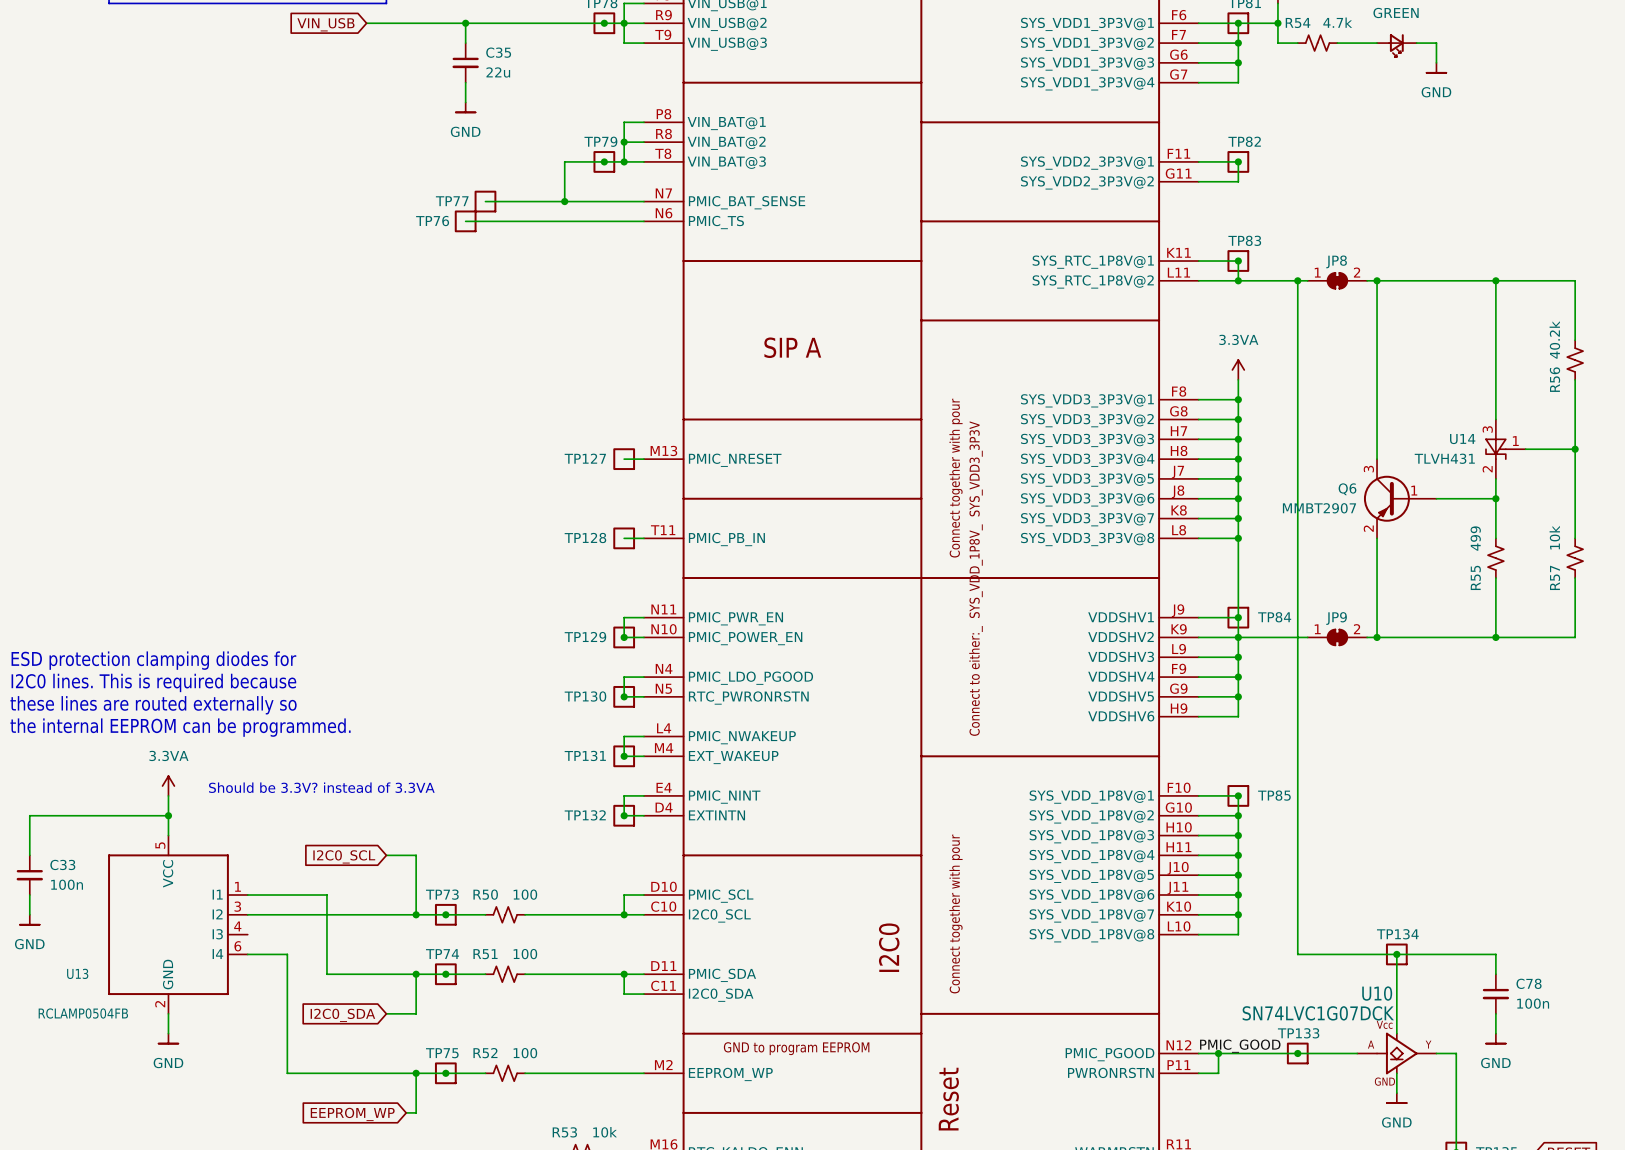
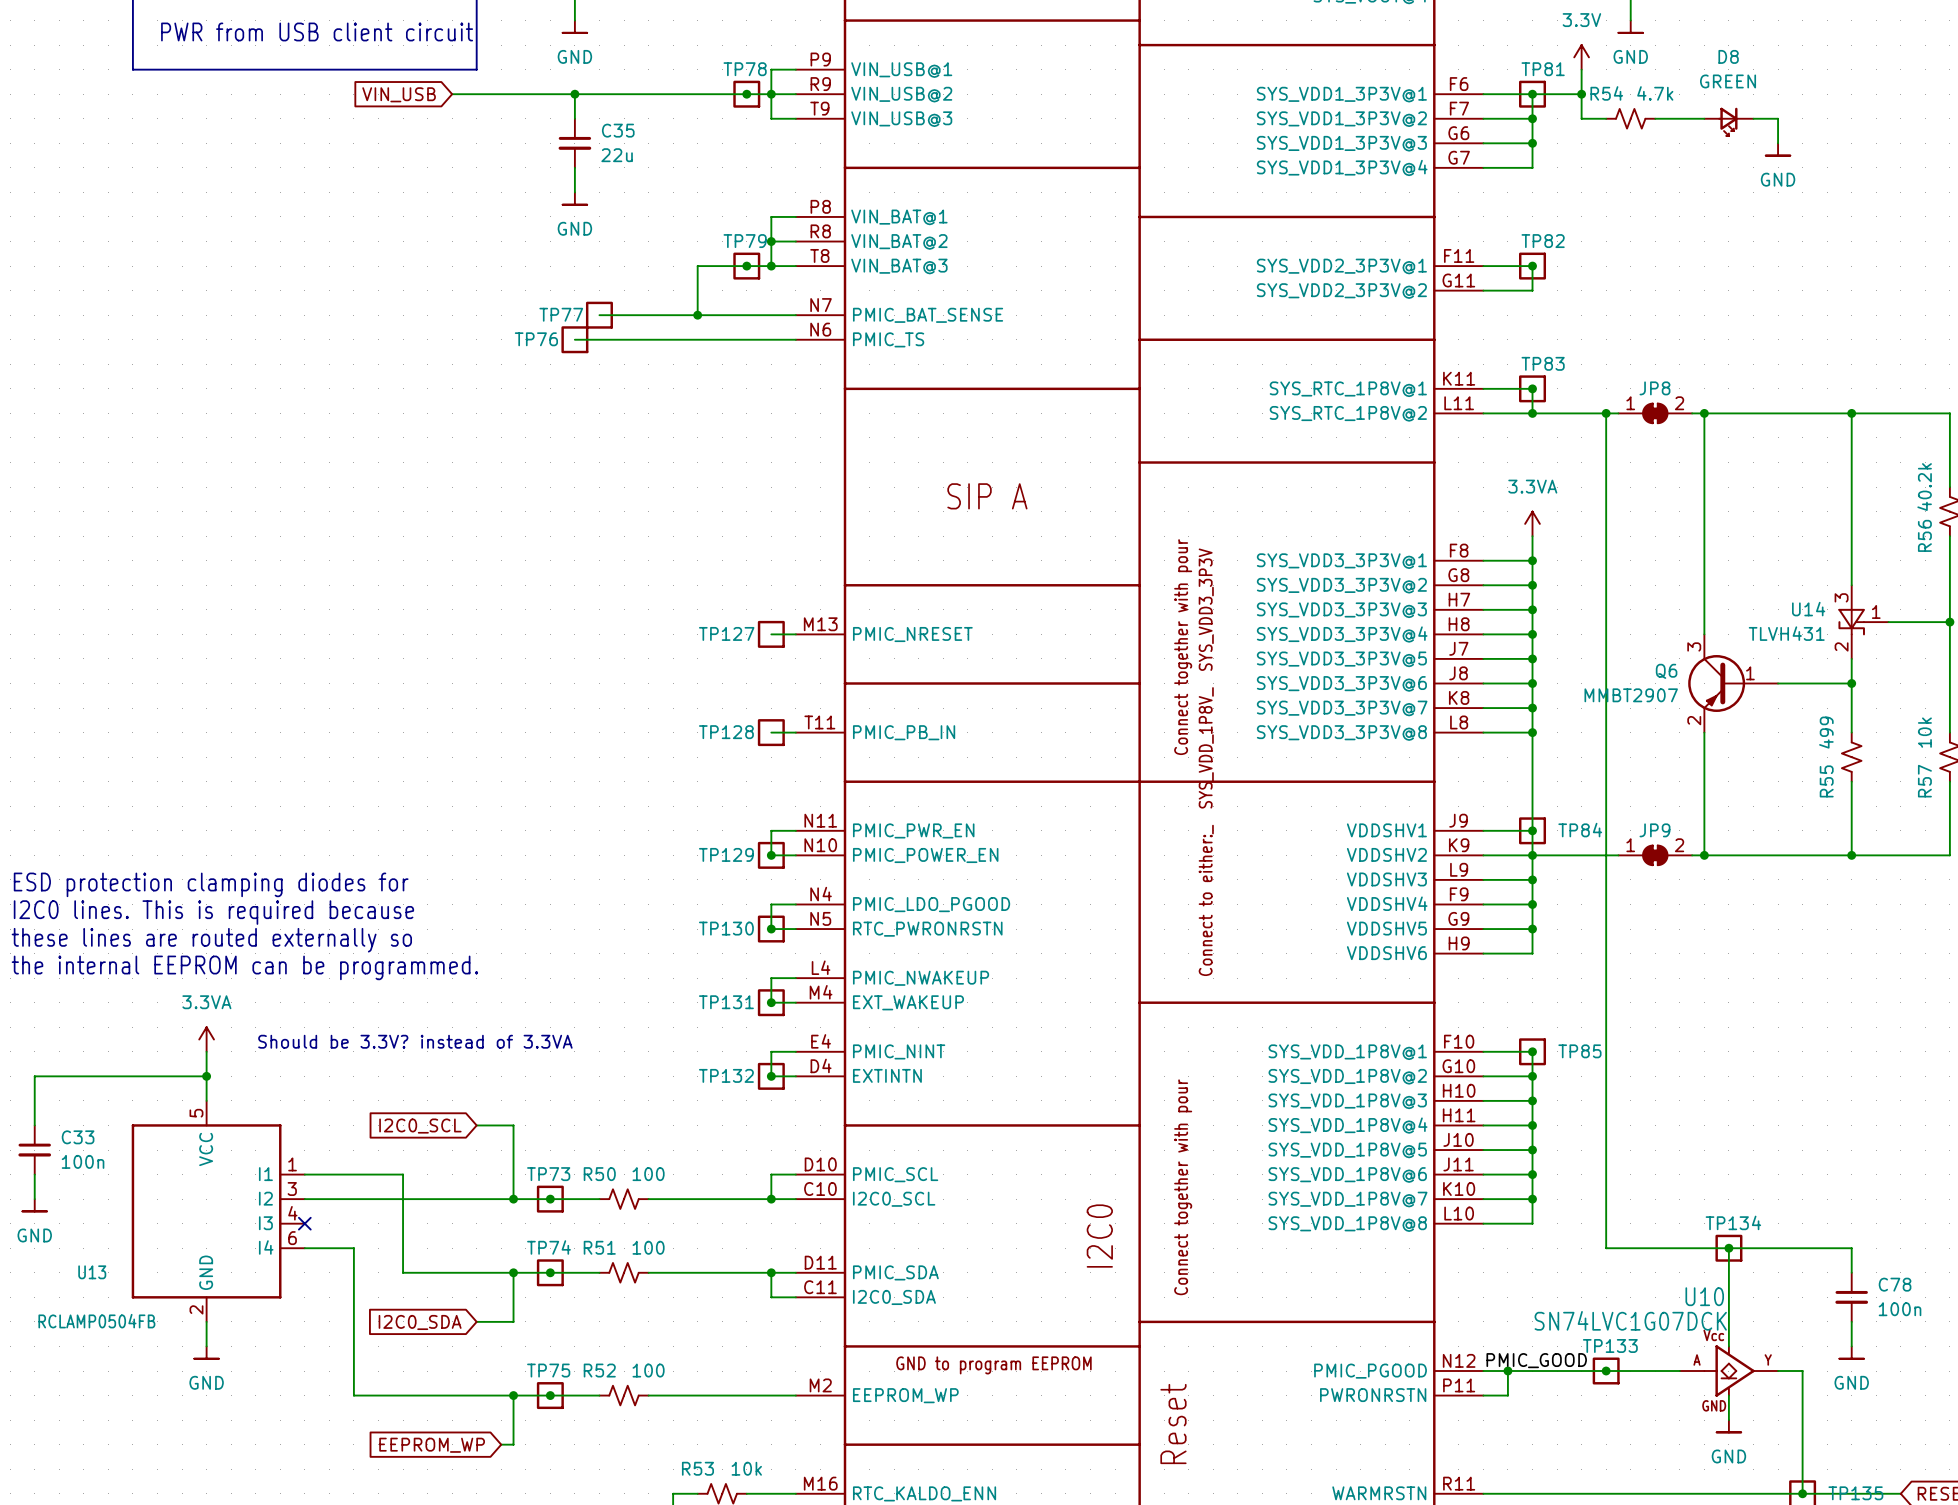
no-connect mark: none -> (304, 1223)

